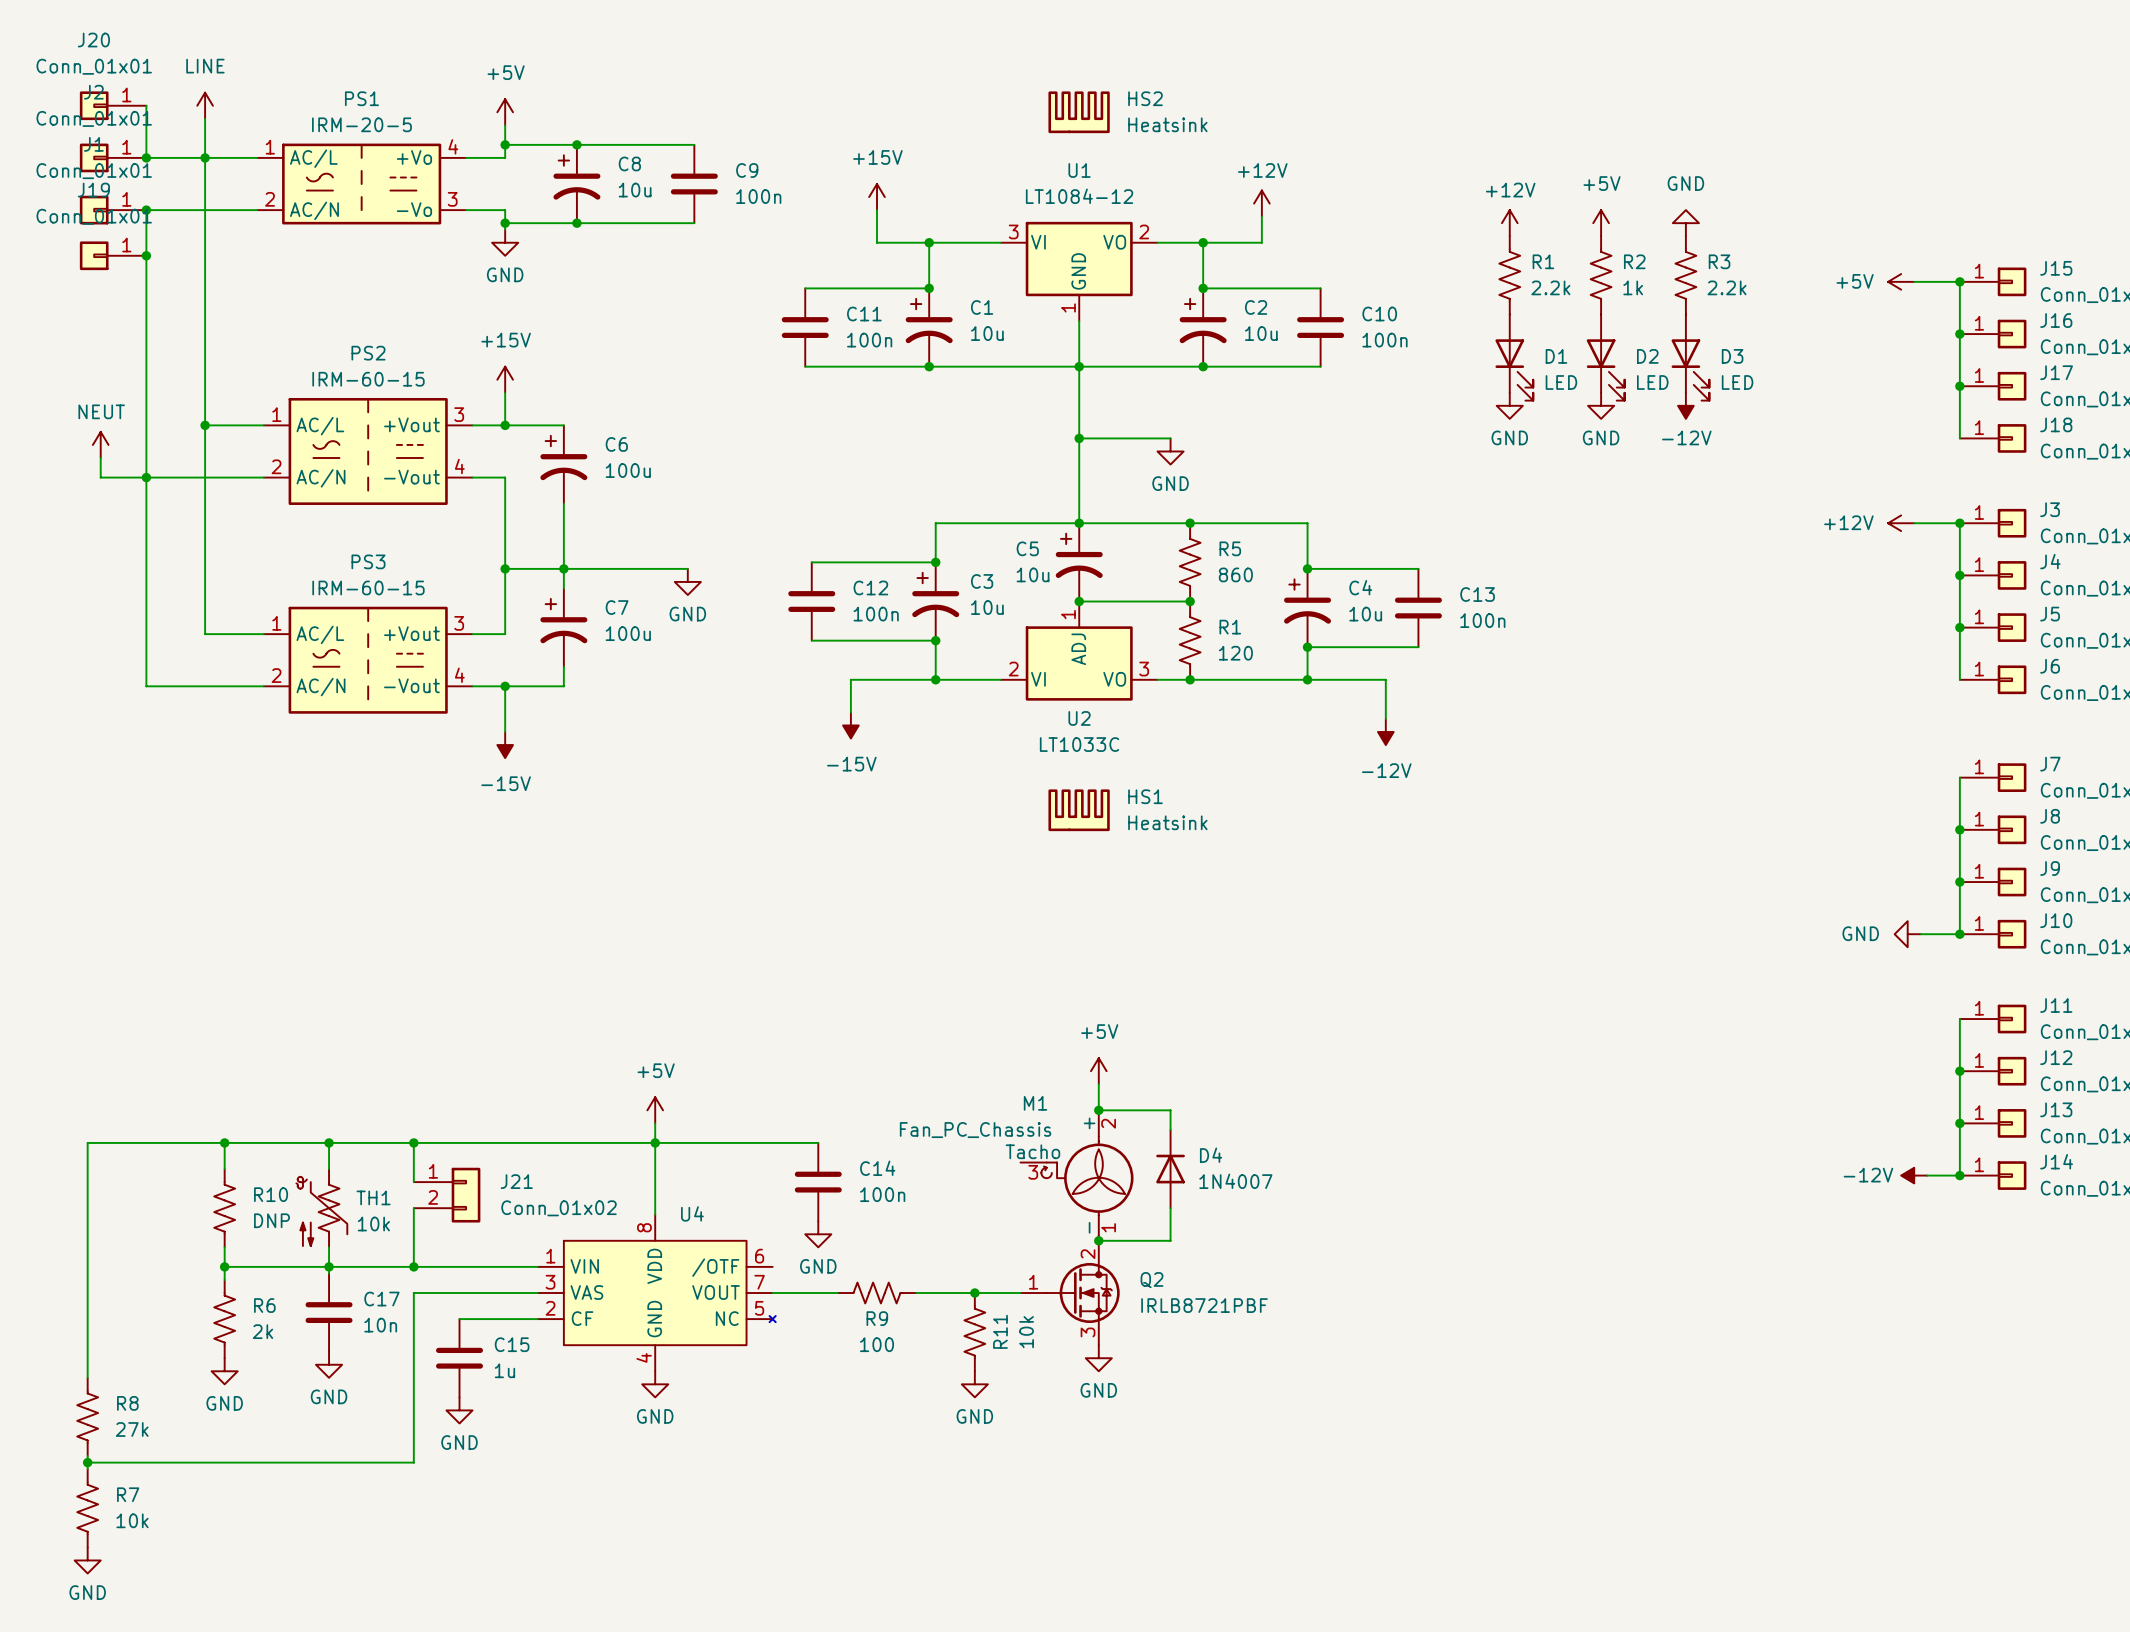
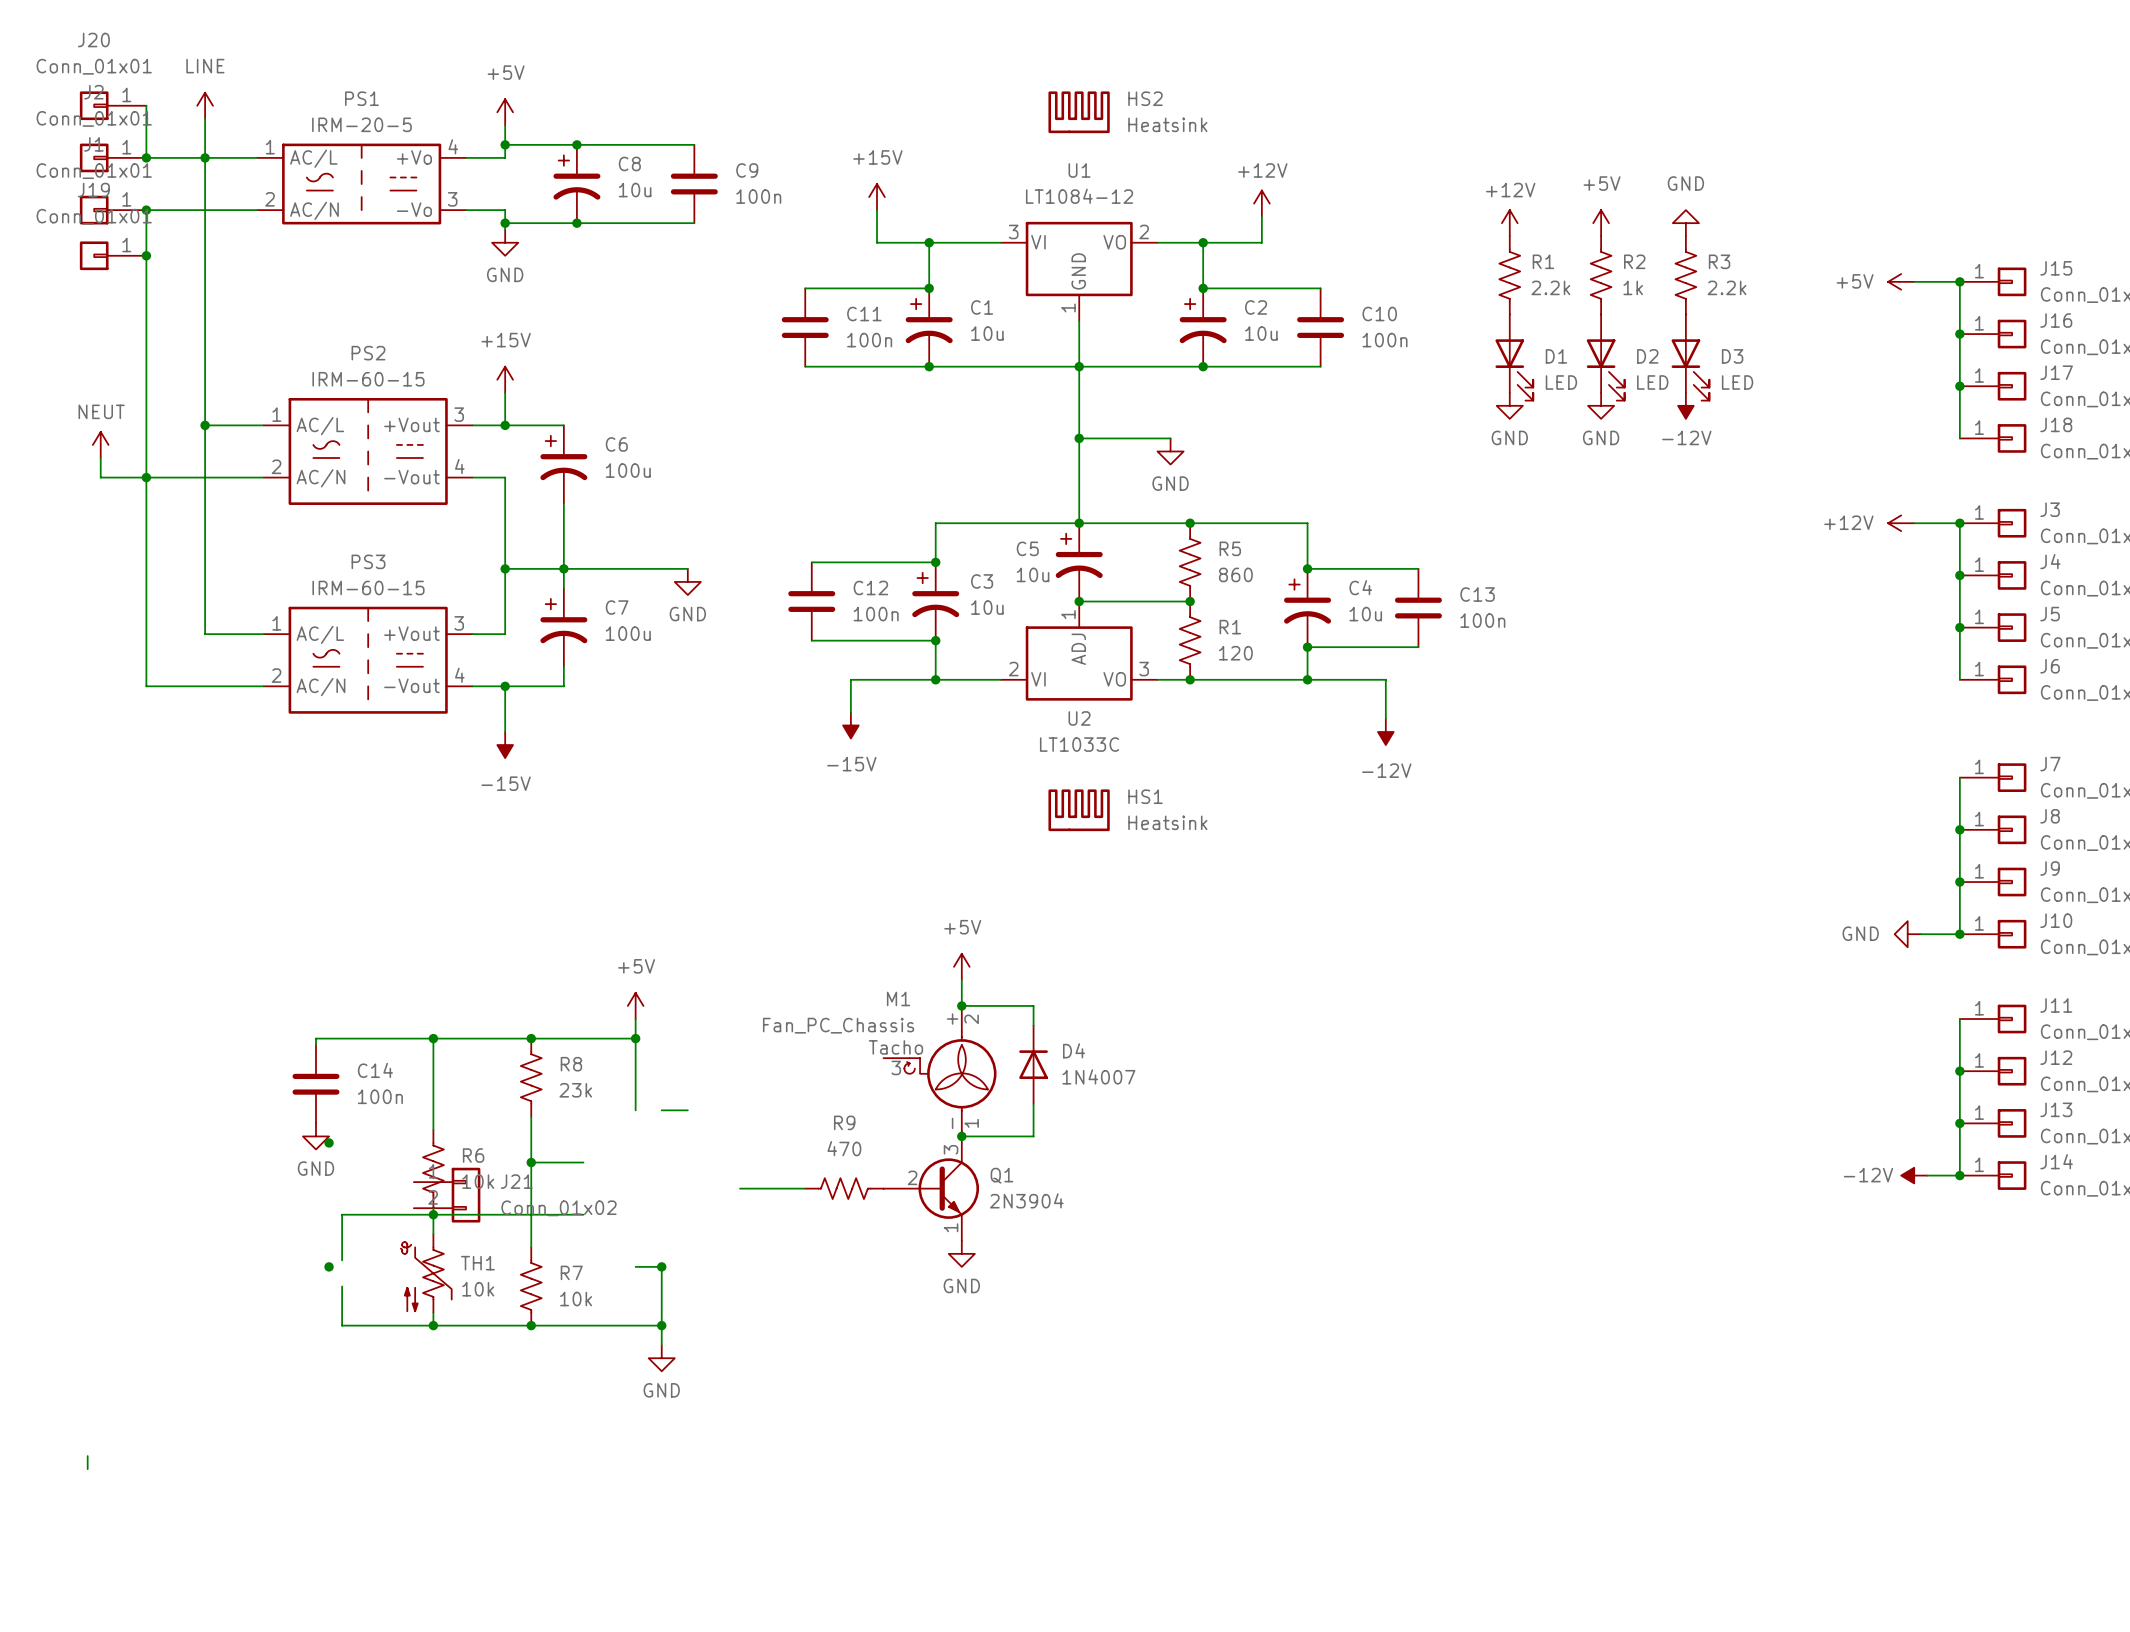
power symbol: none -> +5V (961, 966)
junction: none -> (961, 1005)
wire: none -> (433, 1038) (433, 1129)
junction: none -> (433, 1038)
junction: none -> (531, 1038)
wire: none -> (635, 1038) (315, 1038) (315, 1045)
junction: none -> (635, 1038)
power symbol: +5V (1098, 1071) -> none
wire: (1098, 1084) (1098, 1110) (1170, 1110) (1170, 1129) -> (961, 979) (961, 1005) (1033, 1005) (1033, 1025)
power symbol position: +5V (655, 1110) -> +5V (635, 1005)
wire: none -> (661, 1110) (687, 1110)
junction: (1098, 1110) -> none
wire: none -> (531, 1116) (531, 1247)
wire: (655, 1123) (655, 1214) -> (635, 1019) (635, 1110)
power symbol: none -> GND (315, 1136)
junction: none -> (961, 1136)
wire: (224, 1142) (224, 1169) -> none
junction: (224, 1142) -> none
wire: (329, 1142) (329, 1169) -> none
wire: (413, 1142) (413, 1182) -> none
junction: (413, 1142) -> none
junction: (655, 1142) -> none
wire: (818, 1142) (87, 1142) (87, 1377) -> none
wire: none -> (531, 1162) (583, 1162)
junction: none -> (531, 1162)
D4 position: (1170, 1169) -> (1033, 1064)
M1 position: (1077, 1175) -> (940, 1071)
C14 position: (818, 1182) -> (315, 1084)
Q1: none -> 2N3904 (931, 1188)
R10: DNP (224, 1208) -> none
TH1 position: (321, 1208) -> (426, 1273)
wire: (413, 1208) (413, 1266) -> none
wire: (1170, 1208) (1170, 1240) (1098, 1240) -> (1033, 1103) (1033, 1136) (961, 1136)
junction: none -> (433, 1214)
wire: none -> (583, 1214) (342, 1214) (342, 1260)
power symbol: GND (818, 1234) -> none
junction: (1098, 1240) -> none
wire: (224, 1247) (224, 1279) -> none
wire: (329, 1247) (329, 1273) -> (433, 1208) (433, 1234)
power symbol: none -> GND (961, 1253)
wire: (224, 1266) (537, 1266) -> none
junction: (224, 1266) -> none
junction: (413, 1266) -> none
junction: none -> (661, 1266)
wire: none -> (342, 1286) (342, 1325) (661, 1325)
wire: (537, 1293) (413, 1293) (413, 1462) (87, 1462) -> none
U4: (656, 1293) -> none
wire: (772, 1293) (837, 1293) -> (740, 1188) (805, 1188)
R9 position: (877, 1293) -> (844, 1188)
wire: (916, 1293) (1020, 1293) -> none
junction: (974, 1293) -> none
Q2: IRLB8721PBF (1070, 1293) -> none
C17: 10n (329, 1312) -> none
wire: none -> (433, 1312) (433, 1325)
R9 name position: R9 (877, 1318) -> R9 (844, 1122)
R6 position: (224, 1319) -> (433, 1169)
wire: (459, 1319) (537, 1319) -> none
junction: none -> (433, 1325)
junction: none -> (531, 1325)
junction: none -> (661, 1325)
R6 value: 2k (262, 1331) -> 10k (478, 1181)
R11: 10k (974, 1332) -> none
R9 value: 100 (877, 1344) -> 470 (844, 1148)
C15: 1u (459, 1358) -> none
power symbol: GND (1098, 1358) -> none
power symbol: GND (329, 1364) -> none
power symbol: GND (224, 1371) -> none
power symbol position: GND (655, 1384) -> GND (661, 1358)
power symbol: GND (974, 1384) -> none
power symbol: GND (459, 1410) -> none
R8 position: (87, 1416) -> (531, 1077)
R8 value: 27k (132, 1429) -> 23k (575, 1090)
junction: (87, 1462) -> none
R7 position: (87, 1508) -> (531, 1286)
power symbol: GND (87, 1560) -> none

